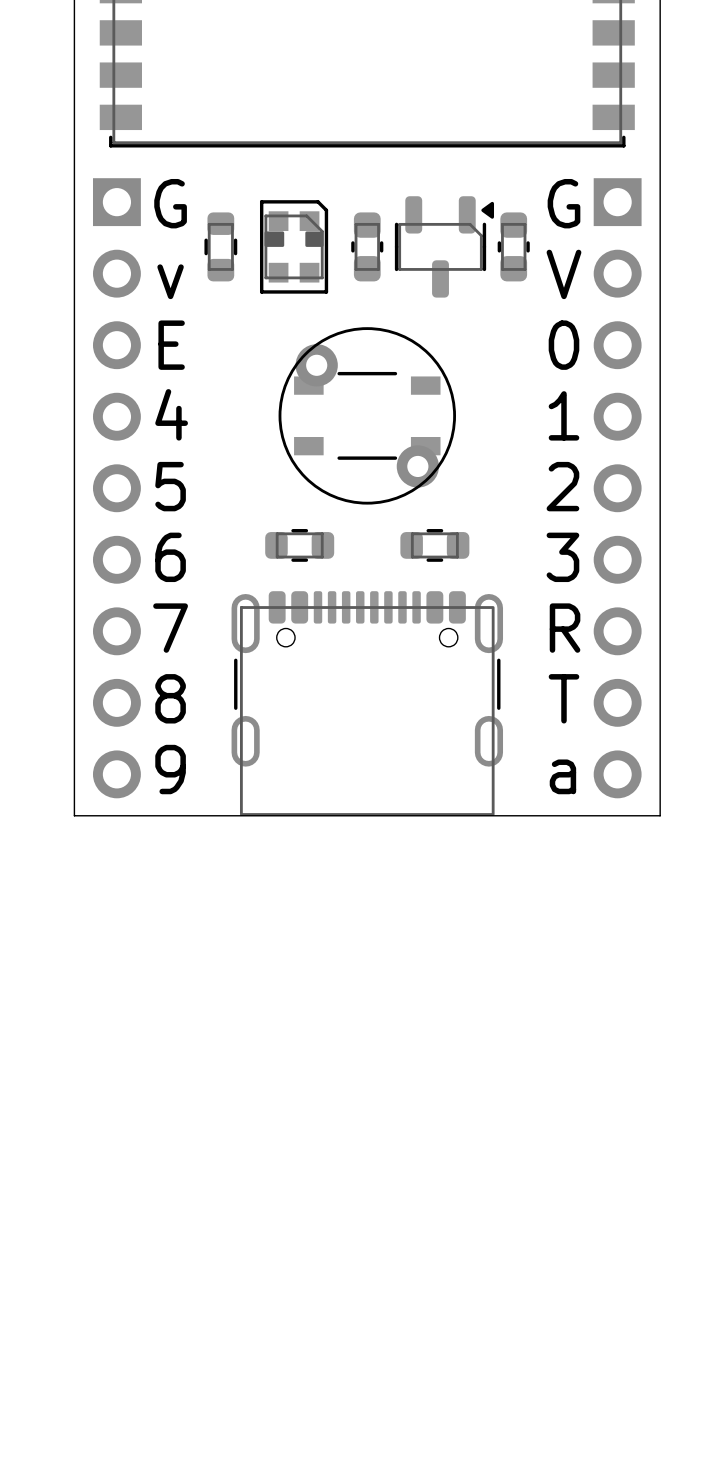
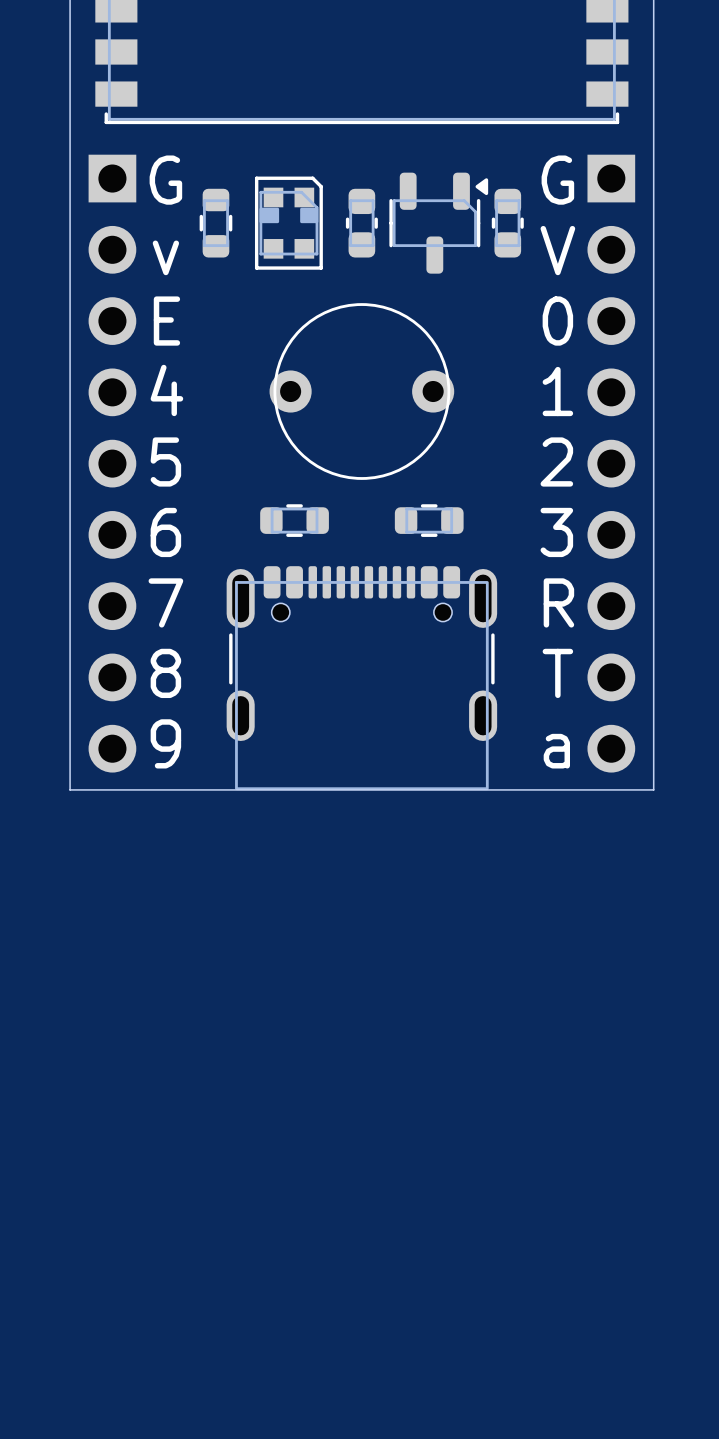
part: (367, 415) -> none
part: (367, 415) -> none
part: none -> (361, 391)

